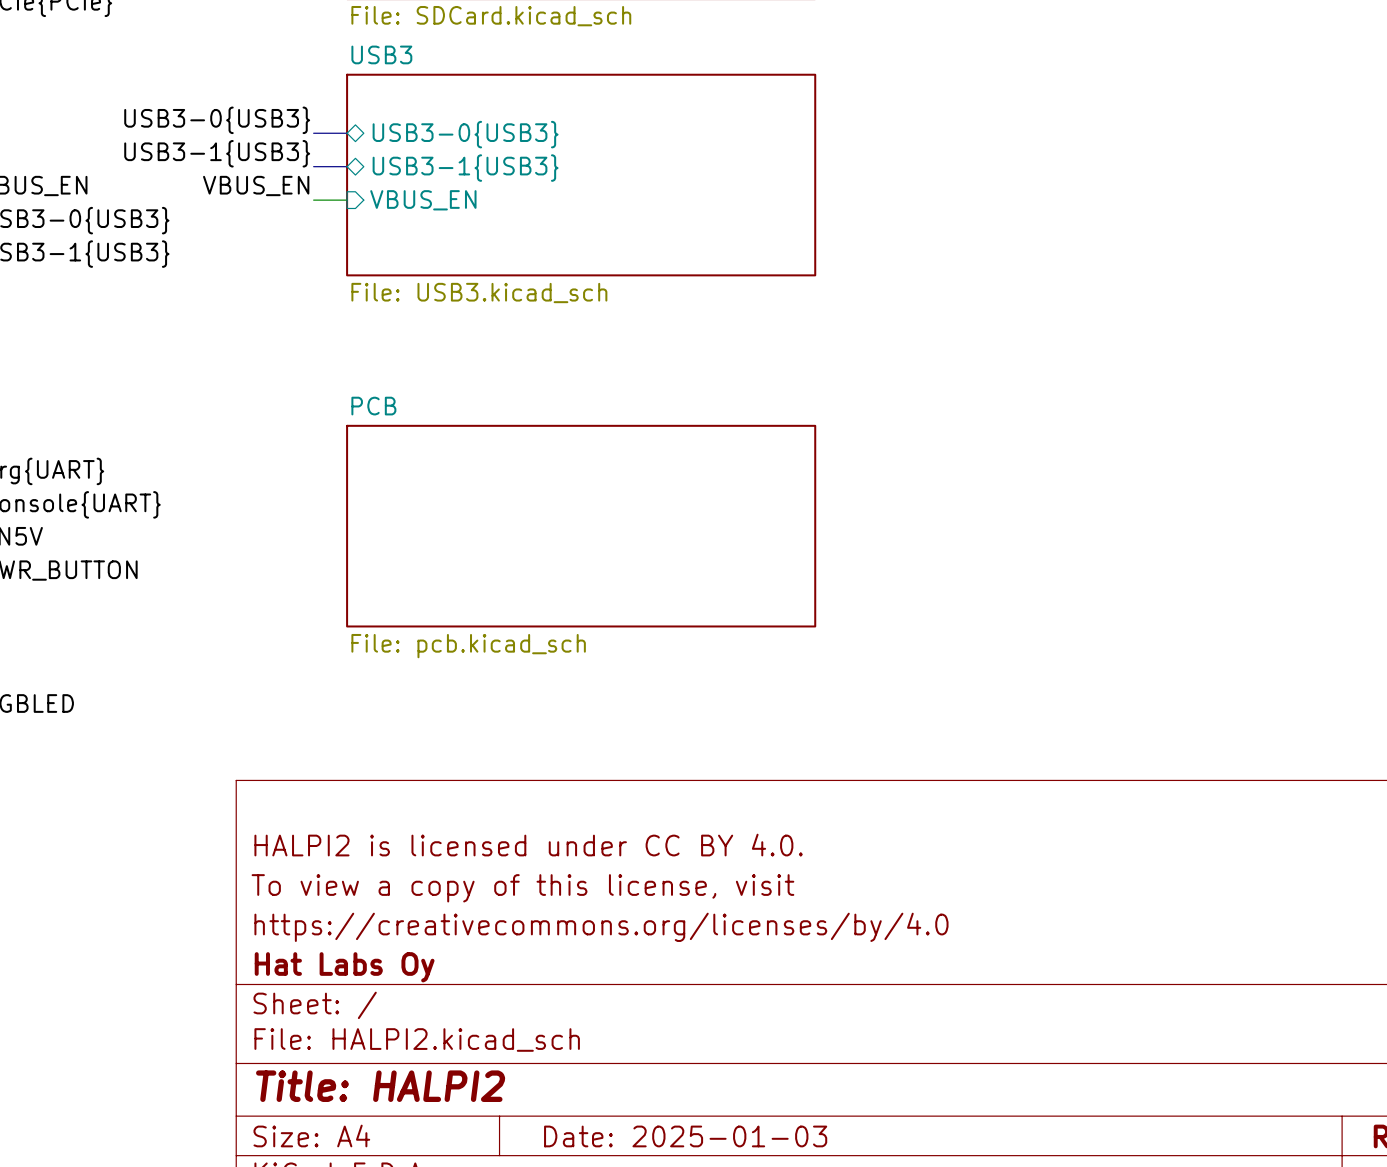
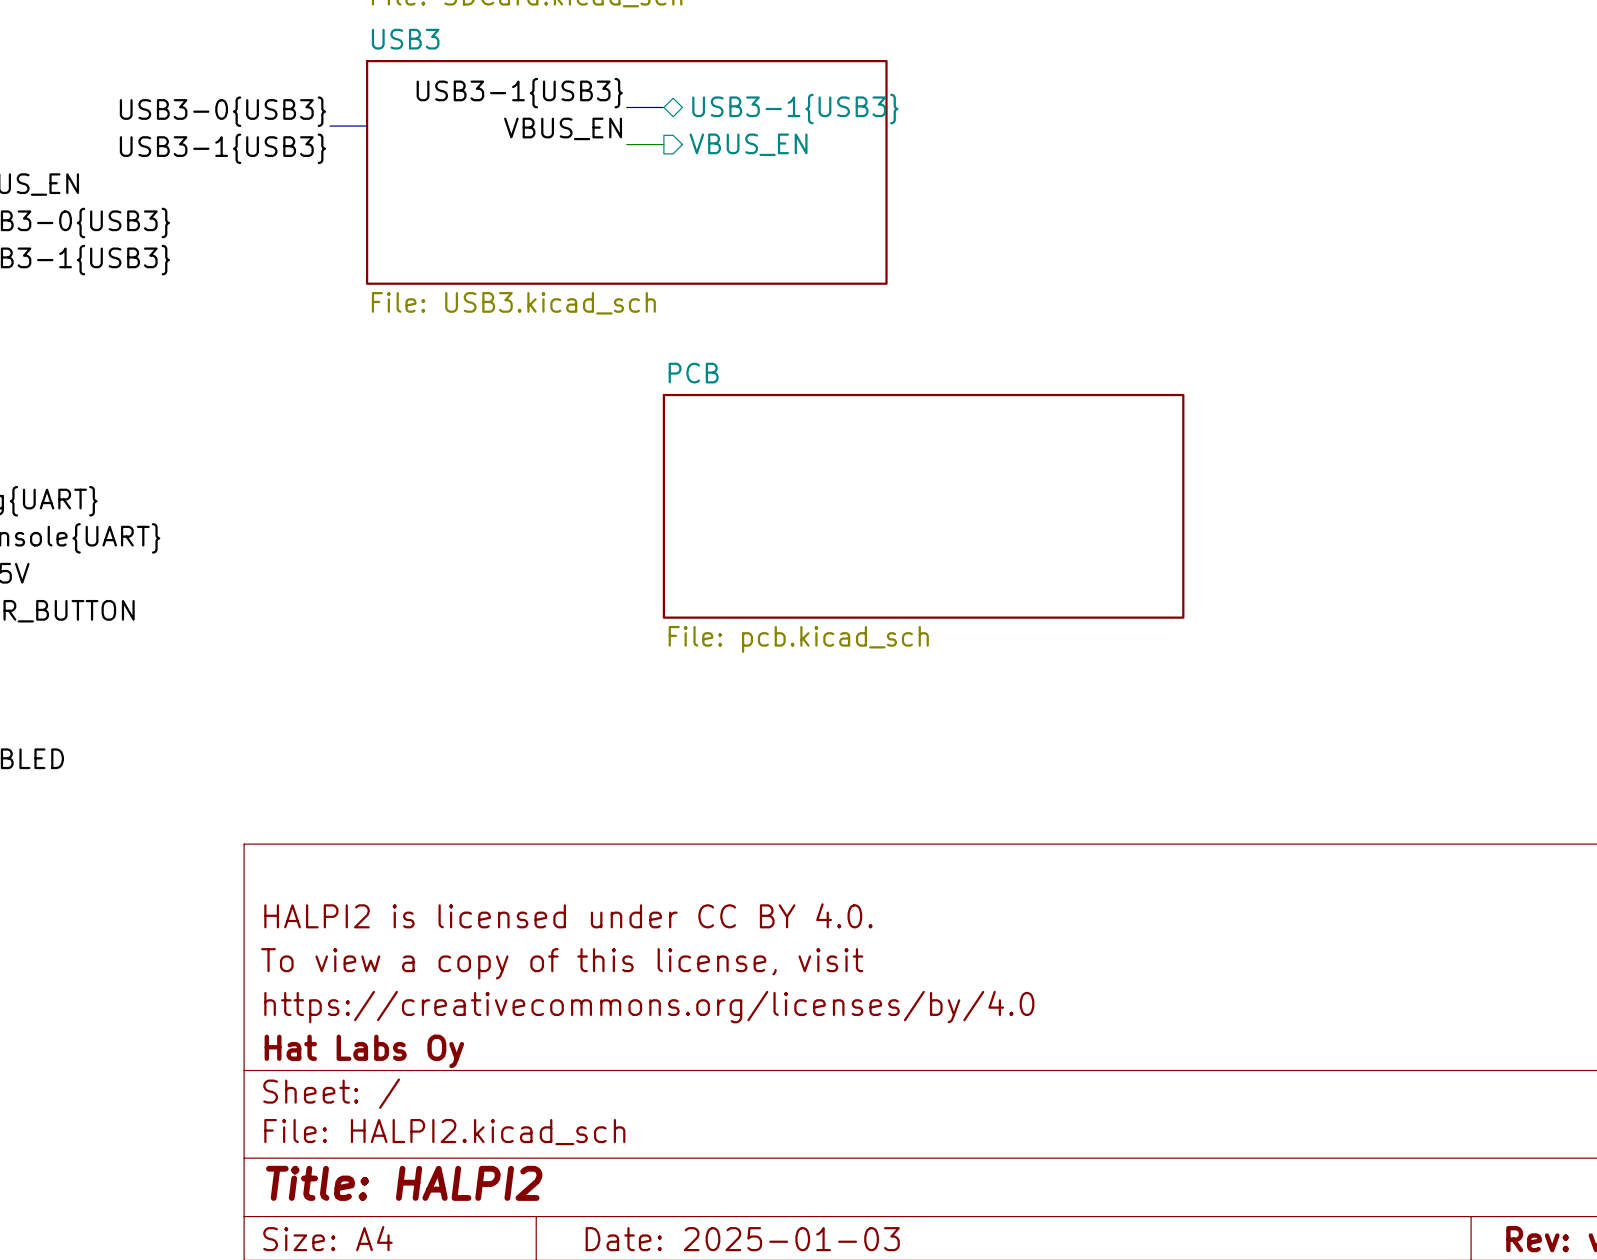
label: none -> USB3-1{USB3} (519, 93)
sheet pin: USB3-0{USB3} (465, 134) -> none
bus: (313, 166) (347, 166) -> (626, 107) (663, 107)
sheet pin position: USB3-1{USB3} (465, 168) -> USB3-1{USB3} (795, 109)
label position: VBUS_EN (256, 186) -> VBUS_EN (563, 128)
wire: (313, 200) (347, 200) -> (626, 144) (663, 144)
sheet pin position: VBUS_EN (423, 200) -> VBUS_EN (748, 144)
sheet PCB position: (581, 526) -> (923, 506)

